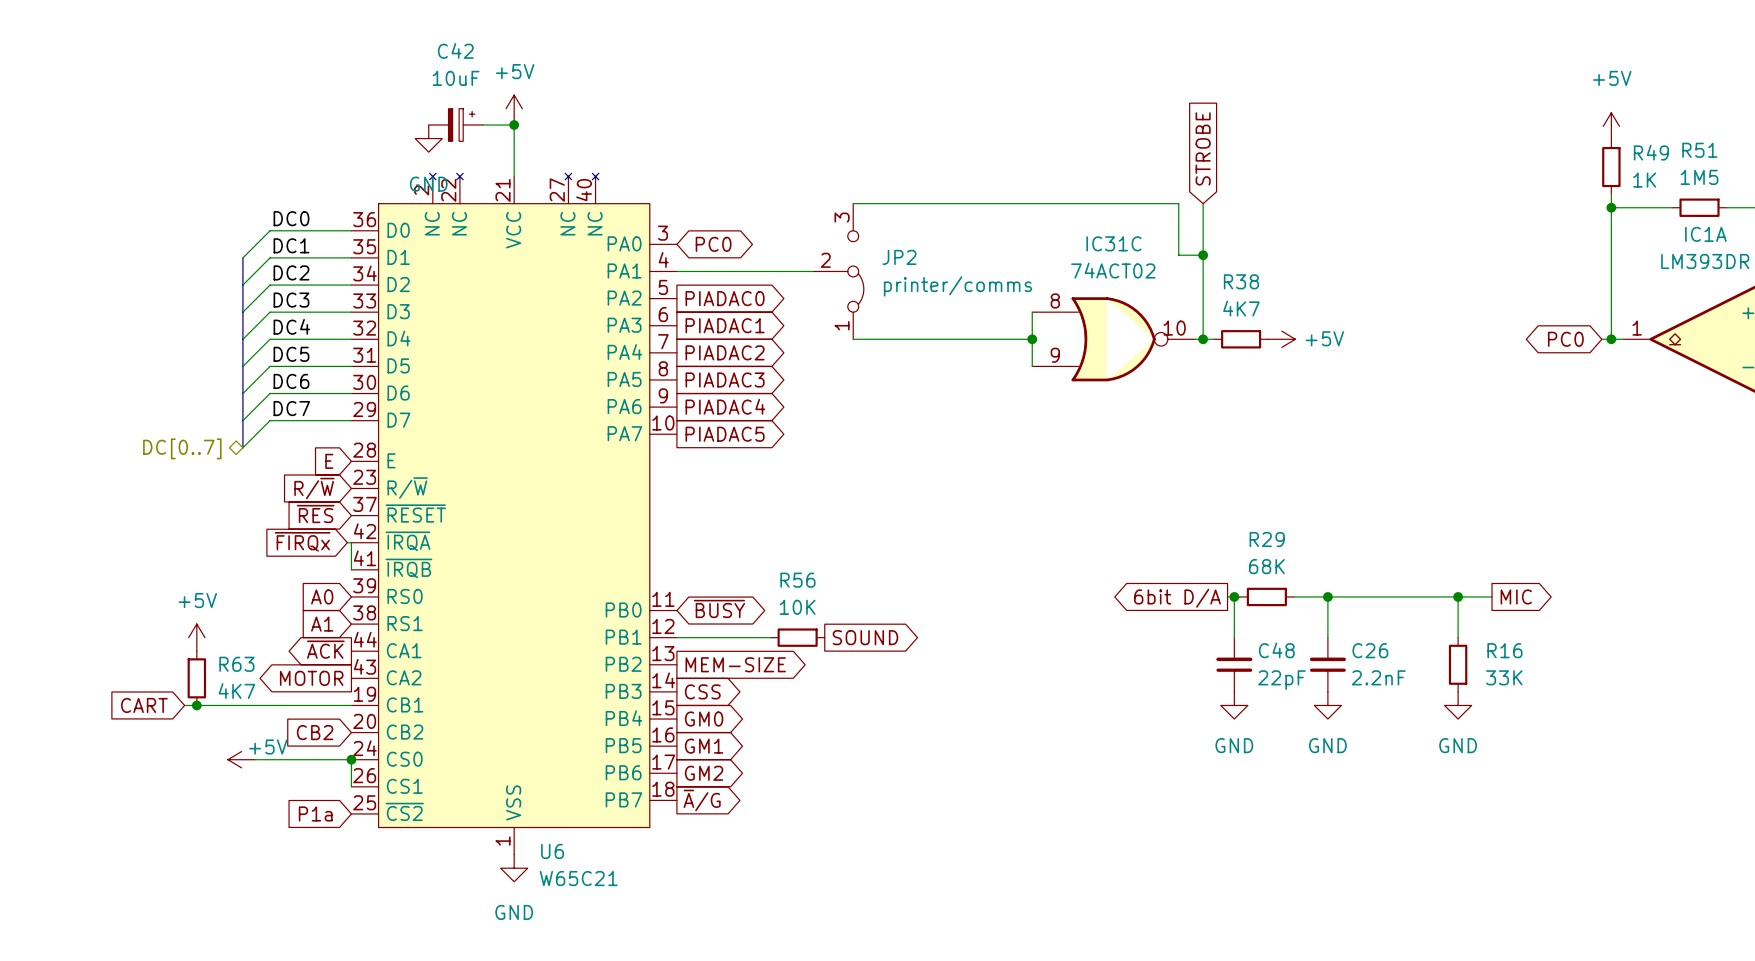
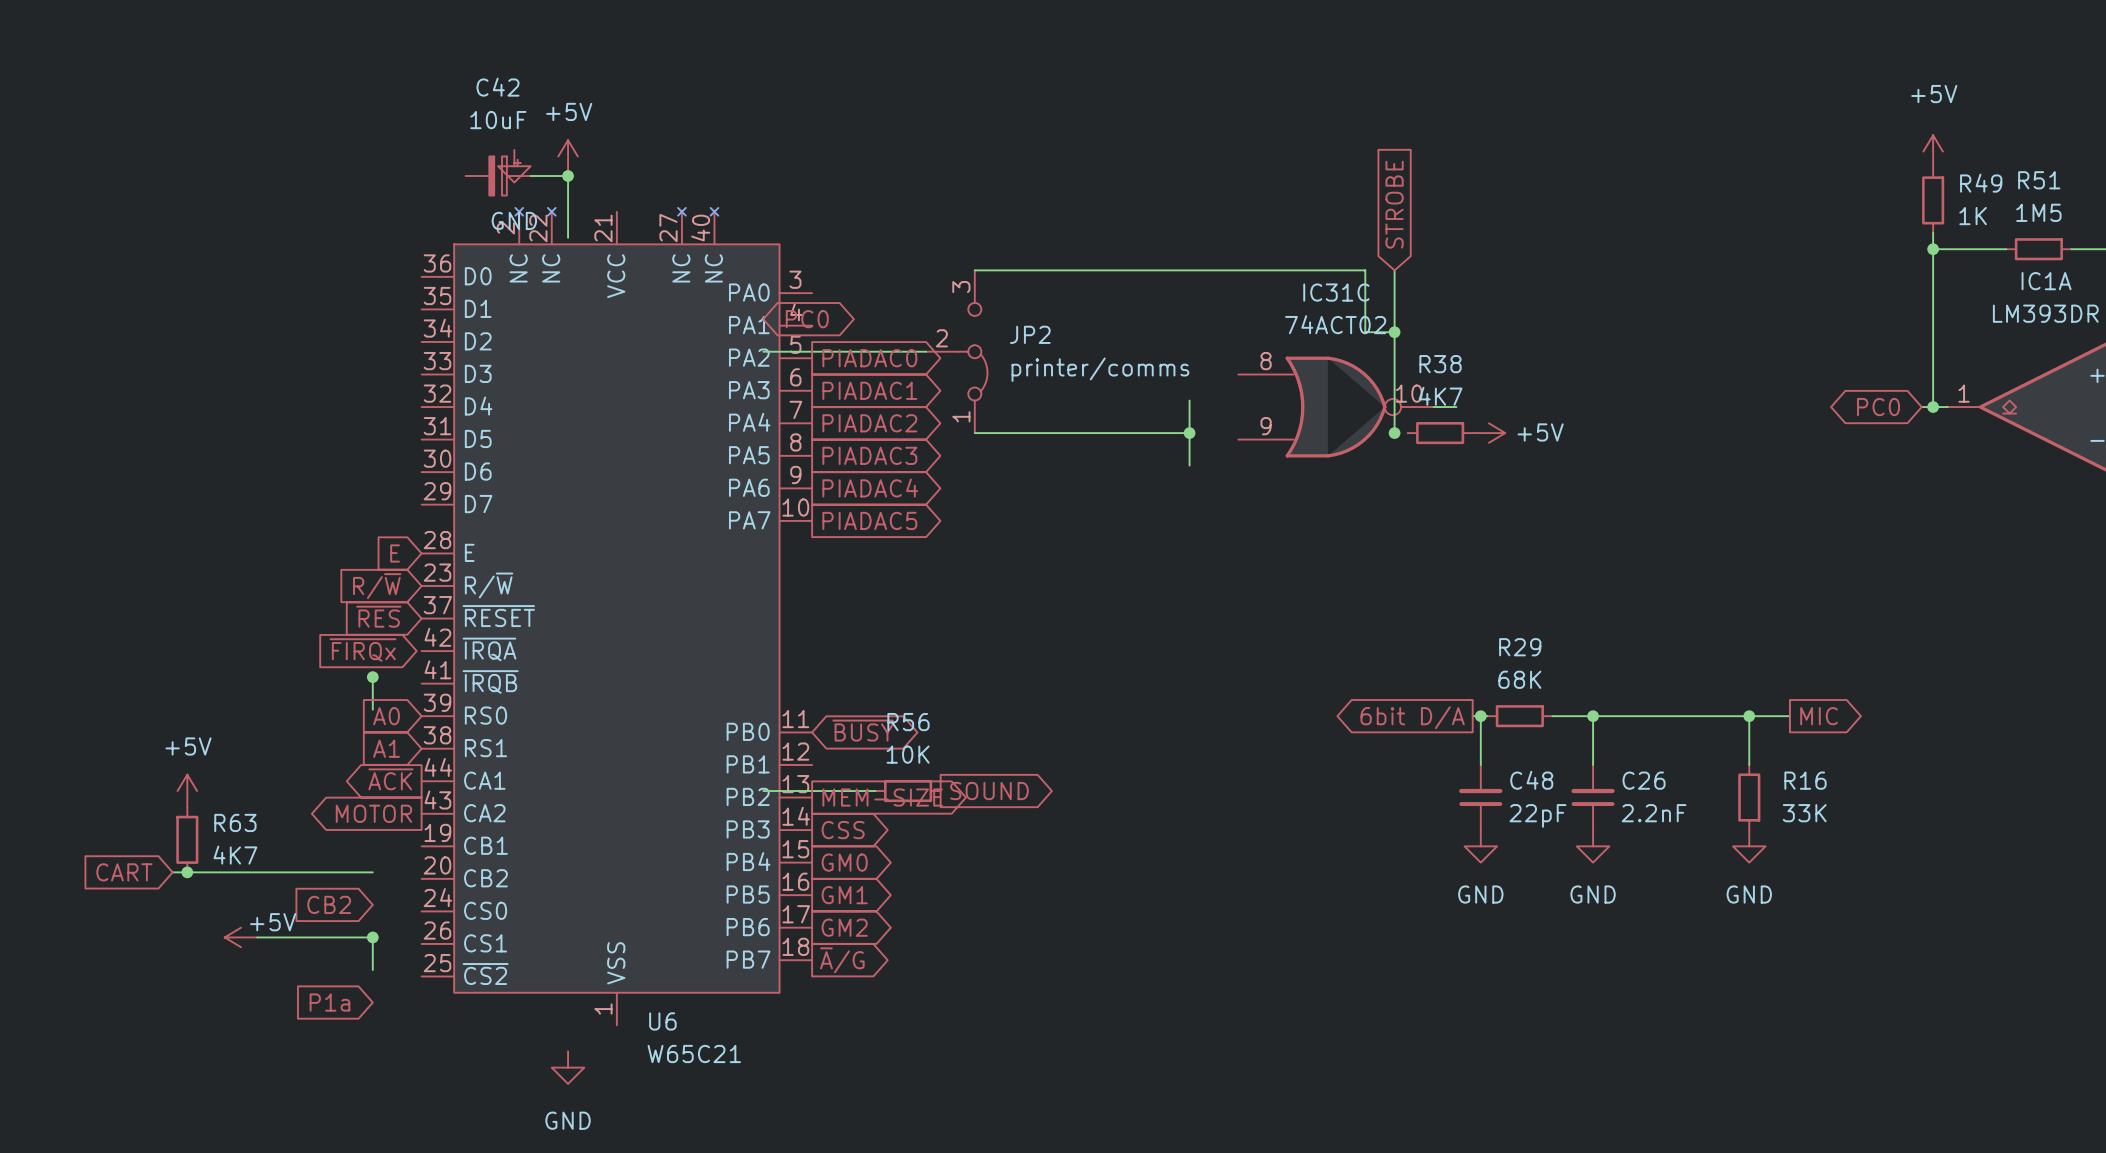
power symbol position: +5V (514, 108) -> +5V (568, 156)
wire: (514, 122) (514, 176) -> (568, 172) (568, 237)
C42 position: (455, 125) -> (498, 176)
wire: (482, 125) (514, 125) -> (530, 176) (568, 176)
junction position: (514, 125) -> (568, 176)
global label position: STROBE (1203, 148) -> STROBE (1394, 204)
wire: (853, 203) (1178, 203) (1178, 255) (1203, 255) -> (974, 270) (1365, 270) (1365, 332) (1394, 332)
wire: (1203, 203) (1203, 339) -> (1394, 270) (1394, 433)
label: DC0 (291, 218) -> none
wire: (351, 230) (270, 230) (242, 257) -> none
global label position: PC0 (713, 244) -> PC0 (807, 319)
label: DC1 (291, 245) -> none
junction: (1203, 255) -> none
bus: (242, 257) (242, 447) -> none
wire: (351, 257) (270, 257) (242, 285) -> none
wire: (676, 271) (812, 271) -> (763, 351) (926, 351)
JP2 position: (838, 271) -> (956, 351)
label: DC2 (291, 272) -> none
junction: none -> (1394, 332)
wire: (351, 285) (270, 285) (242, 312) -> none
label: DC3 (291, 300) -> none
wire: (351, 312) (270, 312) (242, 339) -> none
wire: (1032, 312) (1032, 366) -> (1189, 400) (1189, 465)
label: DC4 (291, 326) -> none
wire: (351, 339) (270, 339) (242, 366) -> none
wire: (853, 339) (1032, 339) -> (974, 433) (1189, 433)
junction position: (1032, 339) -> (1189, 433)
junction: (1203, 339) -> none
R38 position: (1241, 339) -> (1440, 433)
power symbol position: +5V (1281, 339) -> +5V (1488, 433)
label: DC5 (291, 354) -> none
junction: none -> (1394, 433)
wire: (351, 366) (270, 366) (242, 393) -> none
label: DC6 (291, 381) -> none
wire: (351, 393) (270, 393) (242, 420) -> none
label: DC7 (291, 408) -> none
wire: (351, 420) (270, 420) (242, 447) -> none
hierarchical label: DC[0..7] (182, 448) -> none
wire: (347, 542) (351, 542) (351, 569) -> (367, 677) (372, 677) (372, 709)
junction: none -> (372, 677)
power symbol position: +5V (196, 637) -> +5V (187, 791)
wire: (676, 637) (770, 637) -> (763, 791) (875, 791)
R56 position: (797, 637) -> (908, 791)
global label position: SOUND (865, 637) -> SOUND (989, 791)
R63 position: (196, 678) -> (187, 839)
global label position: CART (144, 705) -> CART (124, 872)
wire: (184, 705) (351, 705) -> (172, 872) (372, 872)
junction position: (196, 705) -> (187, 872)
global label position: CB2 (315, 732) -> CB2 (329, 904)
power symbol position: +5V (241, 759) -> +5V (241, 937)
wire: (255, 759) (351, 759) (351, 786) -> (257, 937) (372, 937) (372, 969)
junction position: (351, 759) -> (372, 937)
global label position: P1a (315, 813) -> P1a (329, 1002)
power symbol position: GND (514, 868) -> GND (568, 1067)

